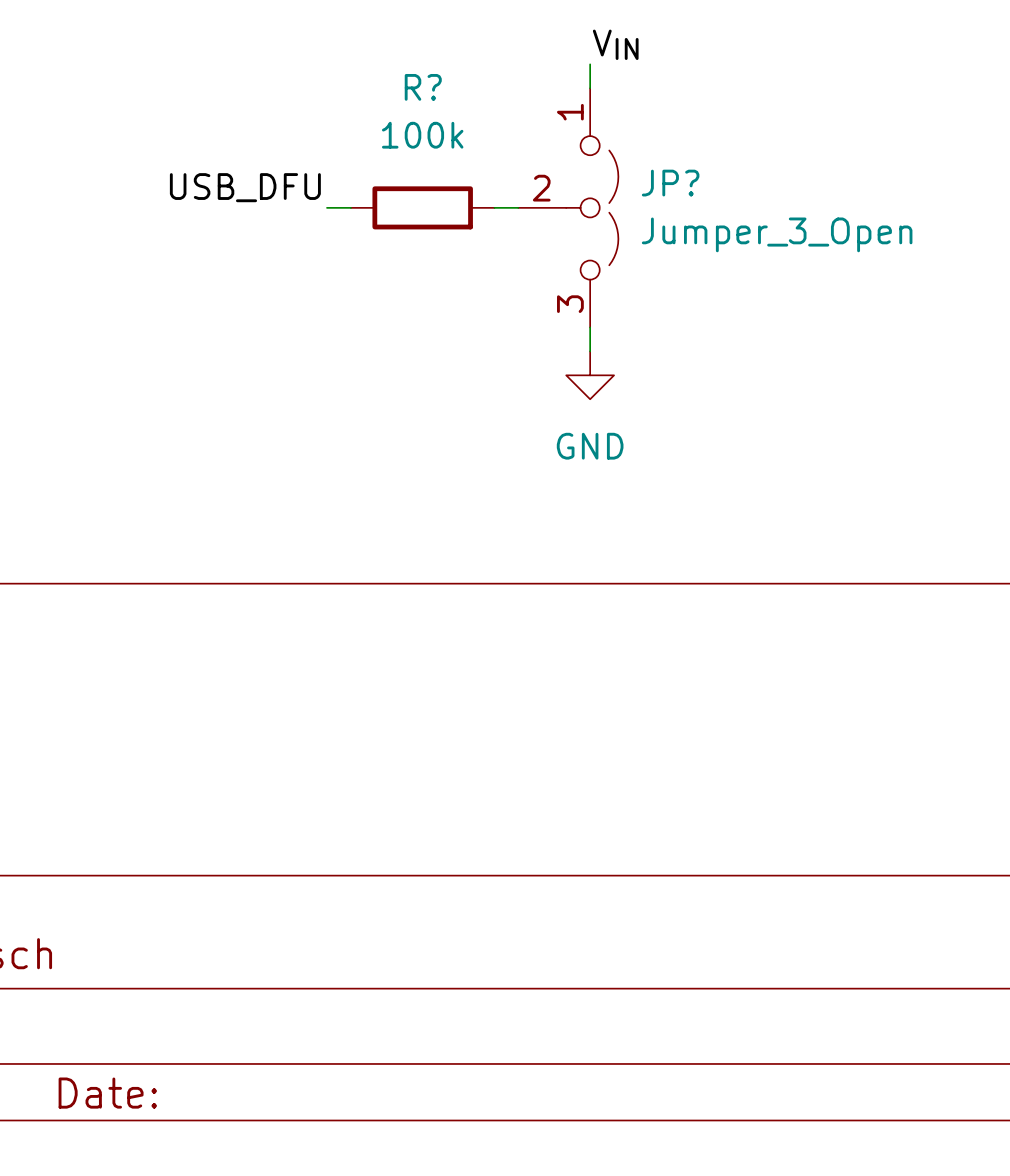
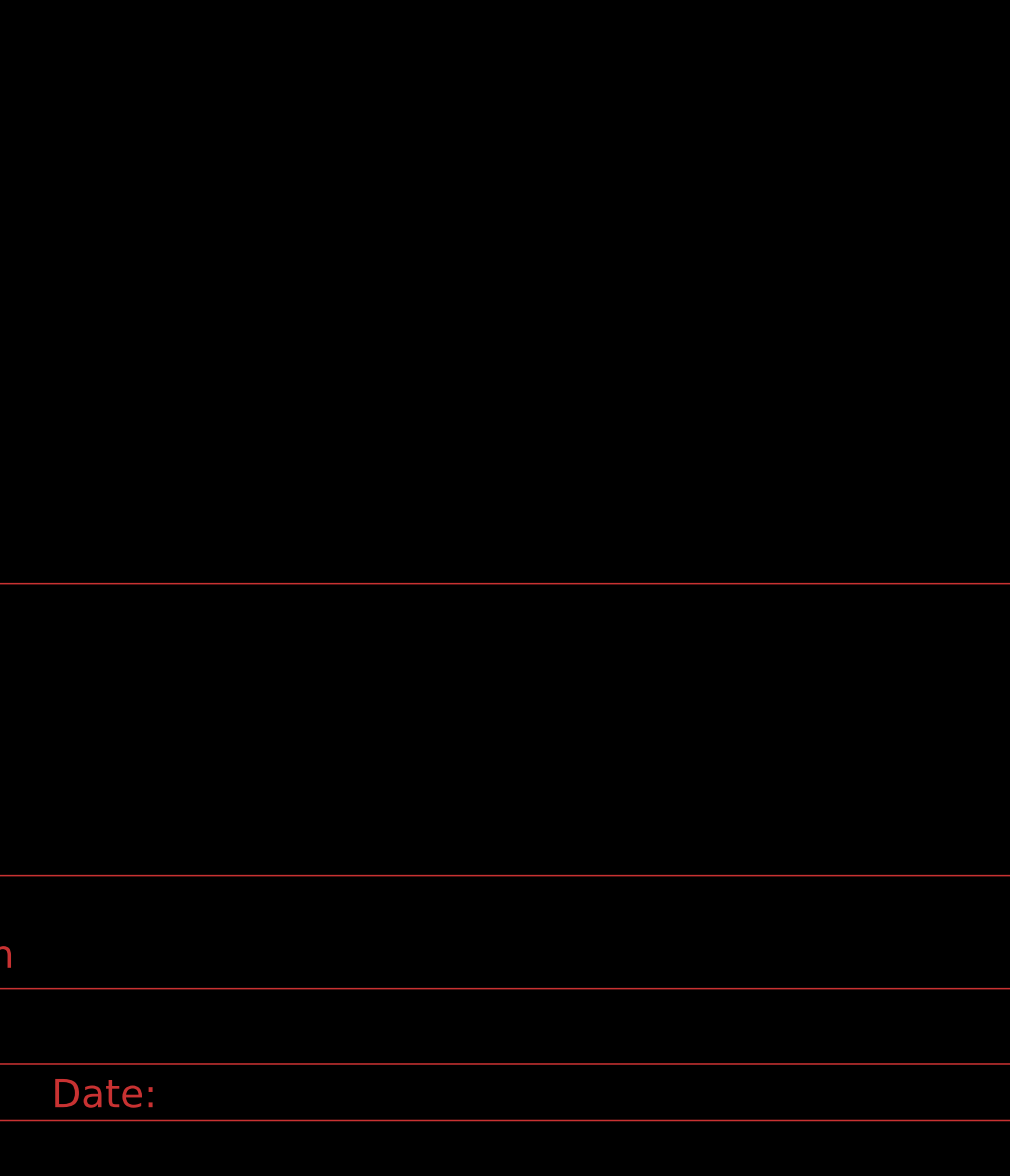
label: VIN (615, 44) -> none
wire: (590, 64) (590, 88) -> none
label: USB_DFU (245, 187) -> none
wire: (327, 207) (350, 207) -> none
R?: 100k (422, 207) -> none
wire: (494, 207) (518, 207) -> none
JP?: Jumper_3_Open (568, 207) -> none
wire: (590, 327) (590, 351) -> none
power symbol: GND (590, 375) -> none

